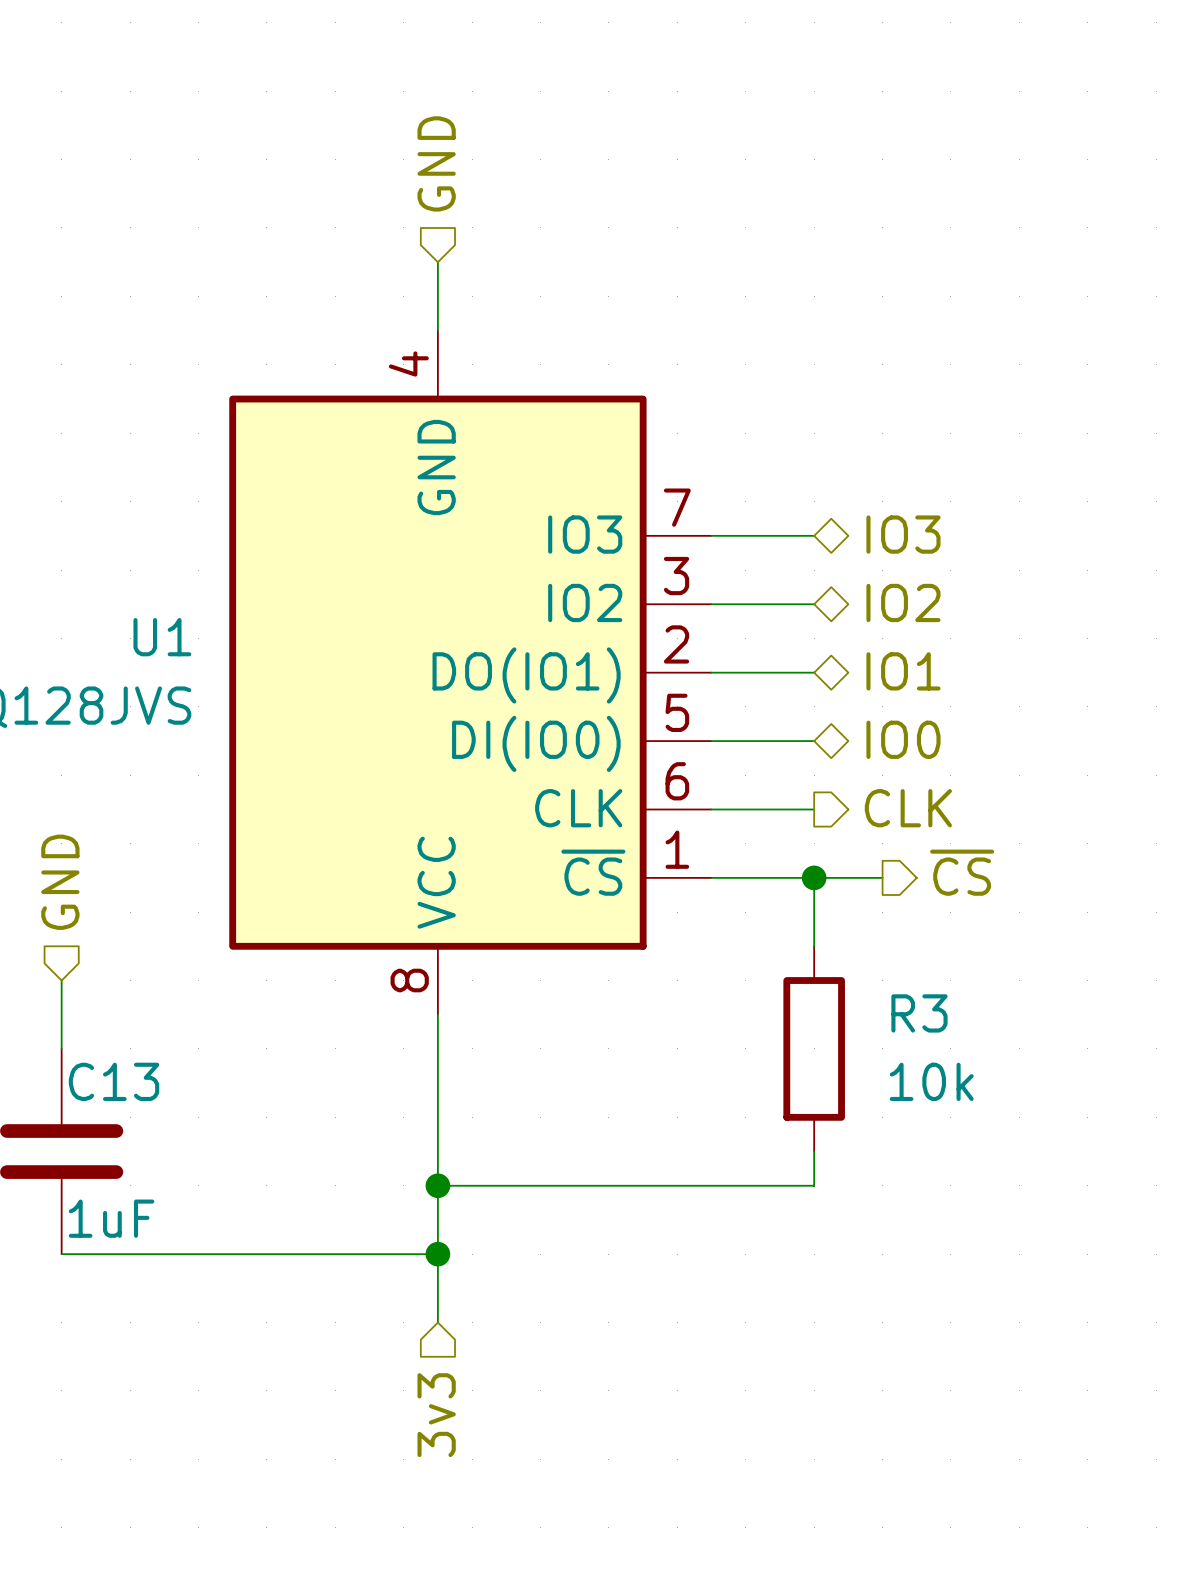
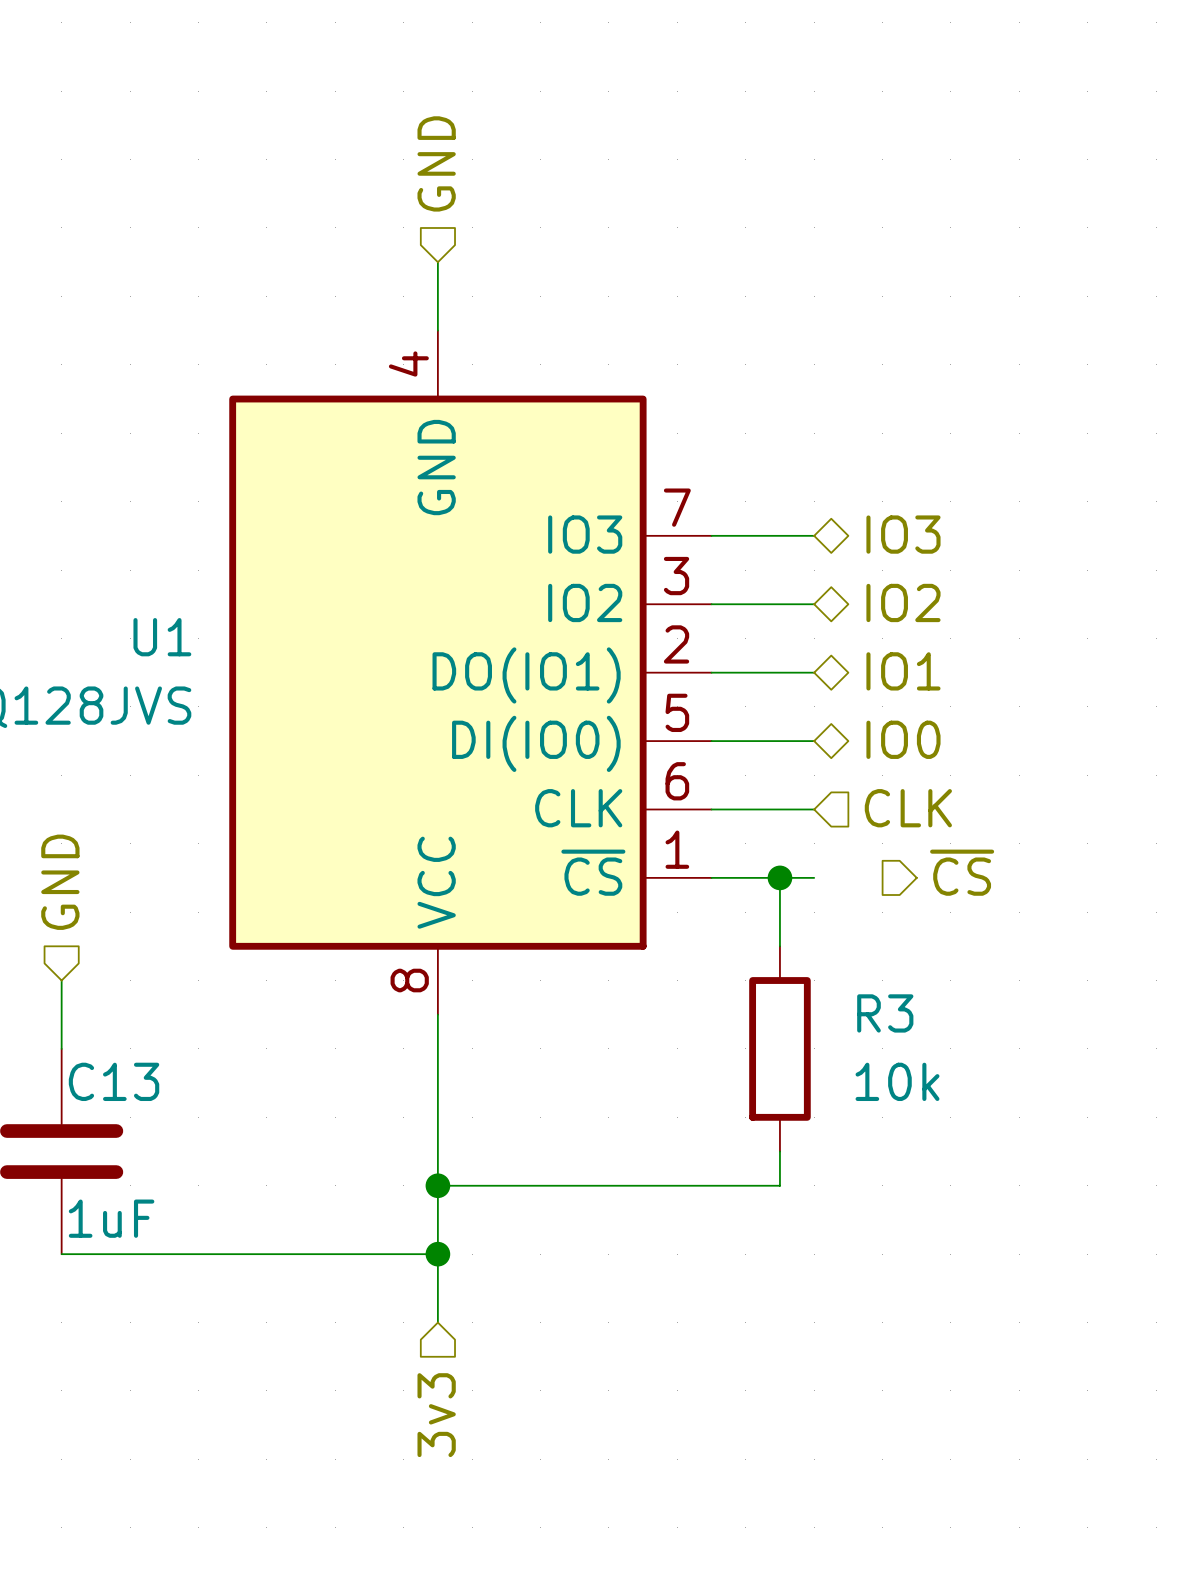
hierarchical label shape: output (908, 808) -> input (908, 808)
wire: none -> (779, 877) (779, 946)
junction position: (814, 877) -> (779, 877)
wire: (882, 877) (814, 877) (814, 946) -> none
R3 position: (814, 1048) -> (779, 1048)
wire: (814, 1151) (814, 1185) (779, 1185) -> (779, 1151) (779, 1185)

